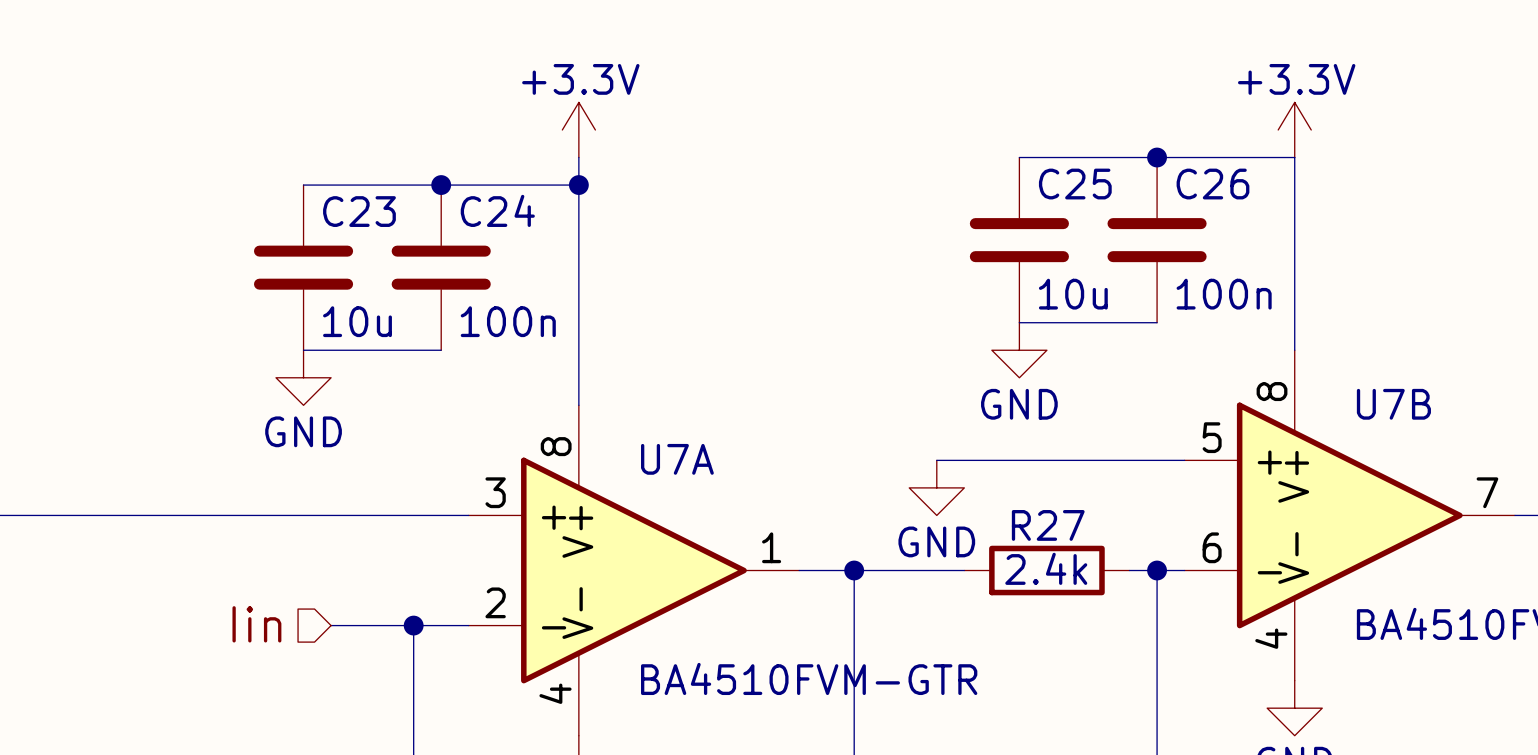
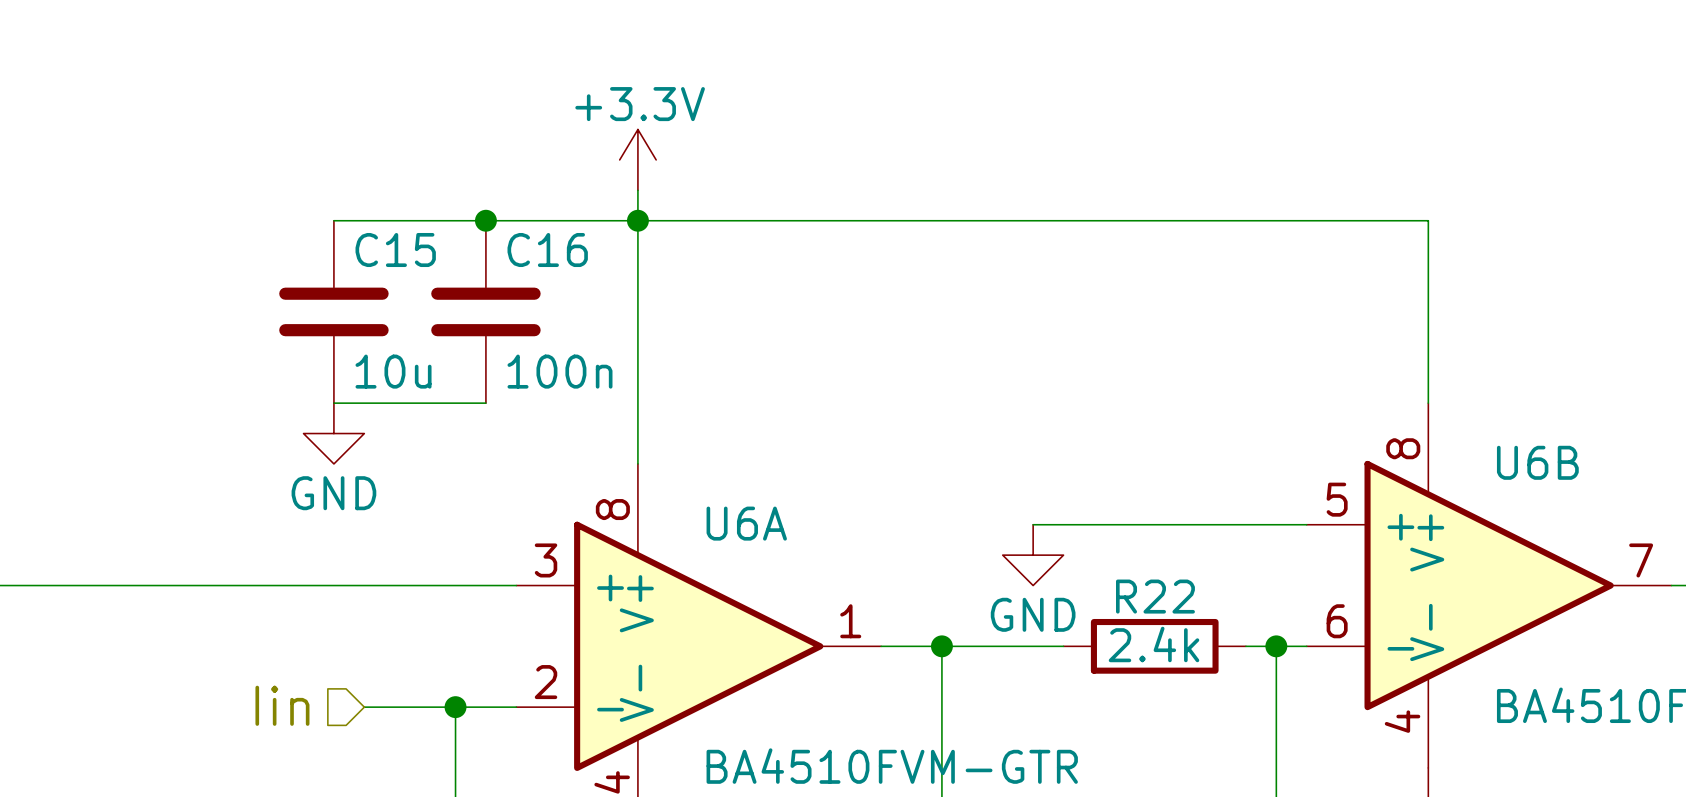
power symbol: +3.3V (1294, 129) -> none
wire: (1019, 157) (1294, 157) (1294, 185) -> (637, 220) (1428, 220)
junction: (1157, 157) -> none
C24 name: C24 (497, 210) -> C16 (547, 250)
C23 name: C23 (359, 211) -> C15 (395, 250)
C25: 10u (1019, 240) -> none
C26: 100n (1157, 240) -> none
wire: (1019, 322) (1157, 322) -> none
power symbol: GND (1019, 350) -> none
U7B name: U7B (1393, 404) -> U6B (1537, 462)
U7A name: U7A (677, 459) -> U6A (746, 523)
R27 name: R27 (1048, 525) -> R22 (1155, 596)

